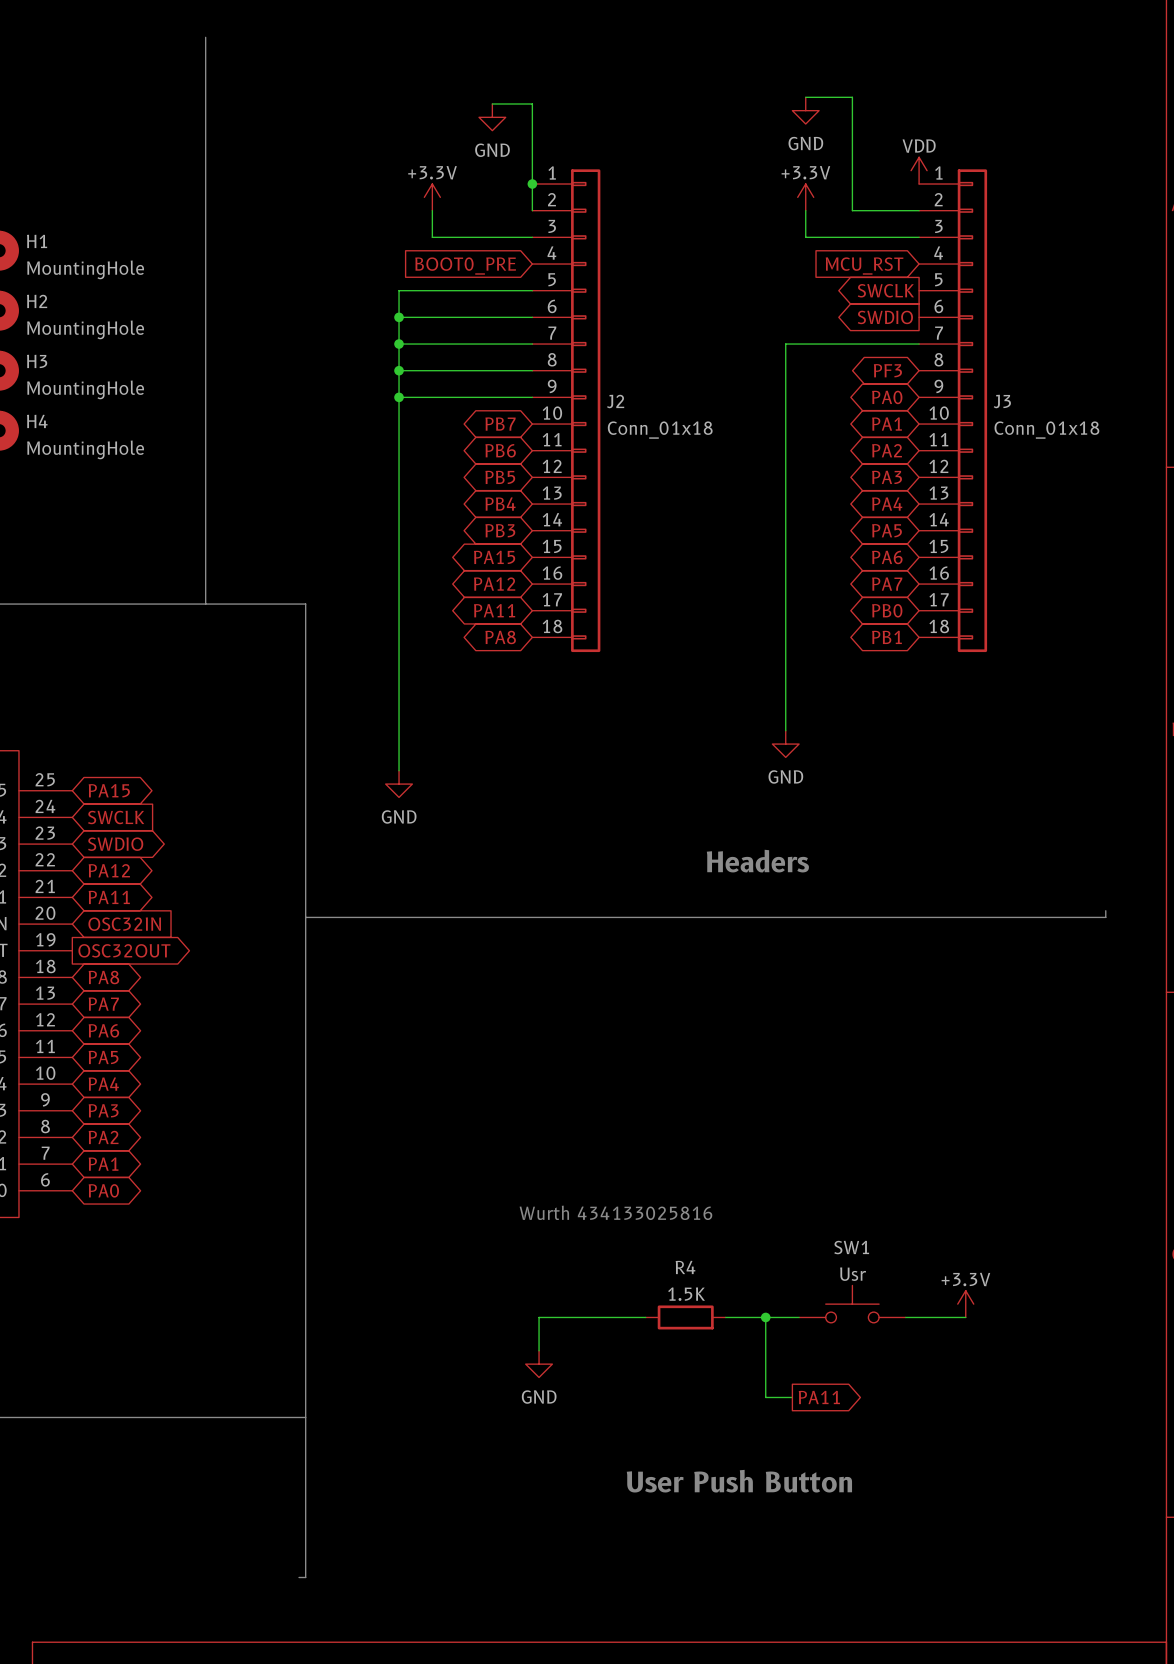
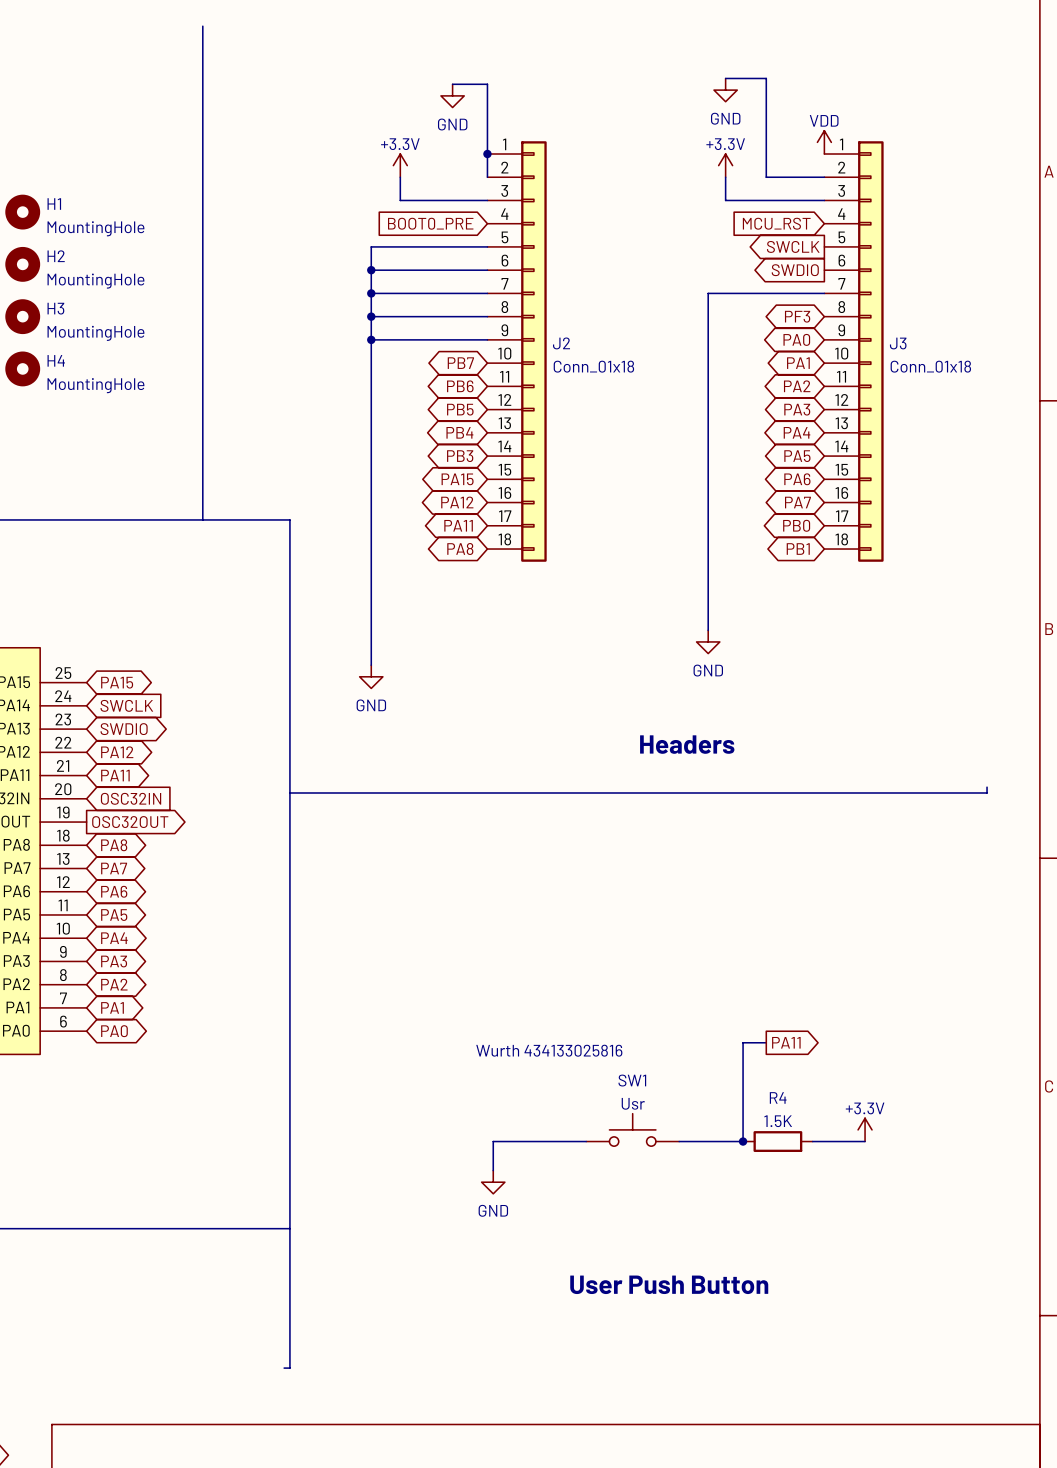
wire: none -> (766, 1042) (743, 1042) (743, 1141) (719, 1141)
SW1 position: (852, 1304) -> (632, 1129)
R4 position: (685, 1317) -> (777, 1141)
wire: (765, 1317) (765, 1397) (792, 1397) -> none
junction position: (765, 1317) -> (743, 1141)
global label position: PA11 (819, 1397) -> PA11 (786, 1042)

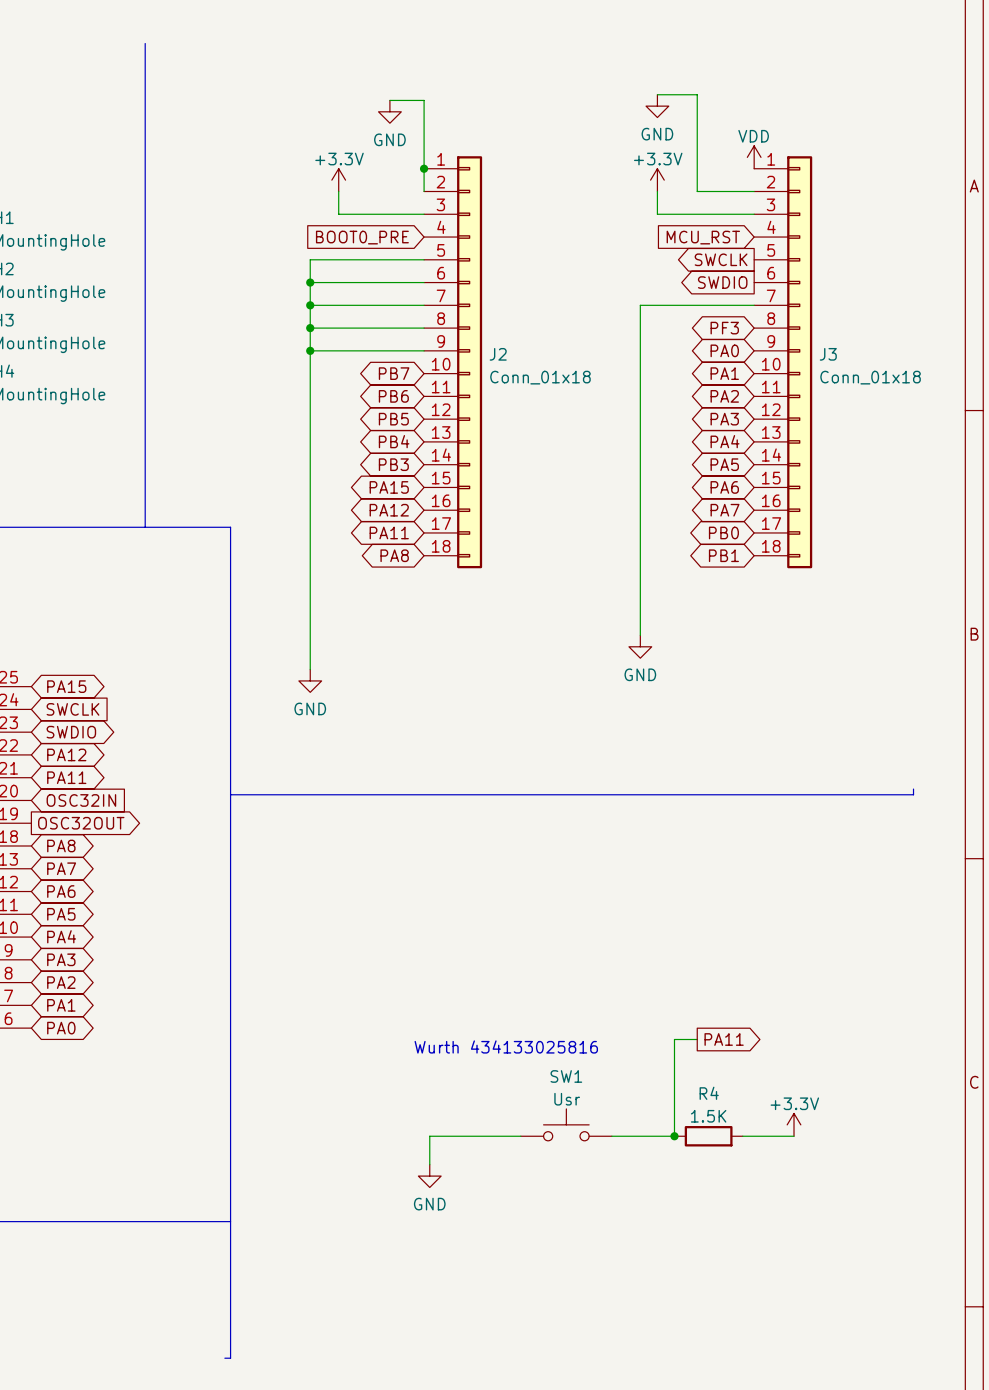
text: Headers (687, 744) -> none
text: User Push Button (669, 1284) -> none

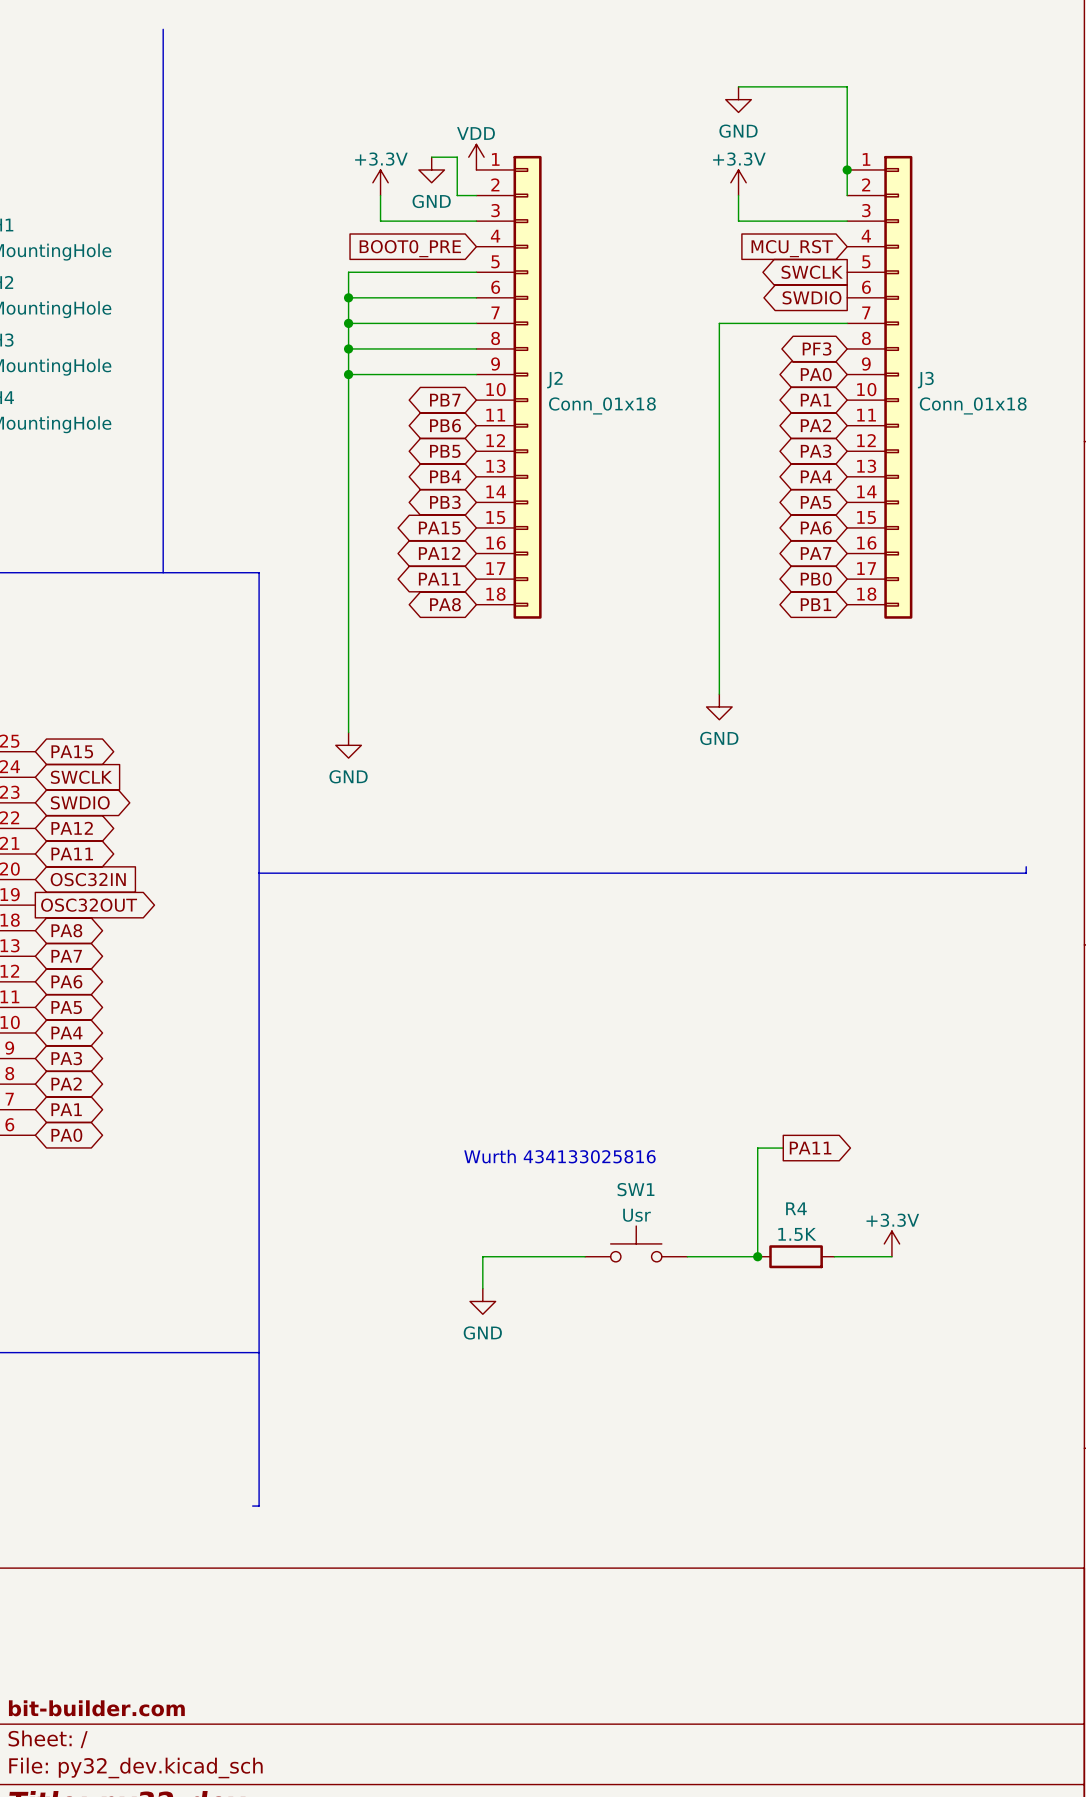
wire: (697, 94) (697, 191) (754, 191) -> (783, 86) (847, 86) (847, 195)
wire: (389, 100) (424, 100) (424, 191) -> (431, 157) (457, 157) (457, 195) (476, 195)
power symbol position: GND (389, 111) -> GND (431, 169)
power symbol: none -> VDD (476, 157)
power symbol: VDD (754, 157) -> none
junction: (424, 168) -> none
junction: none -> (847, 169)

